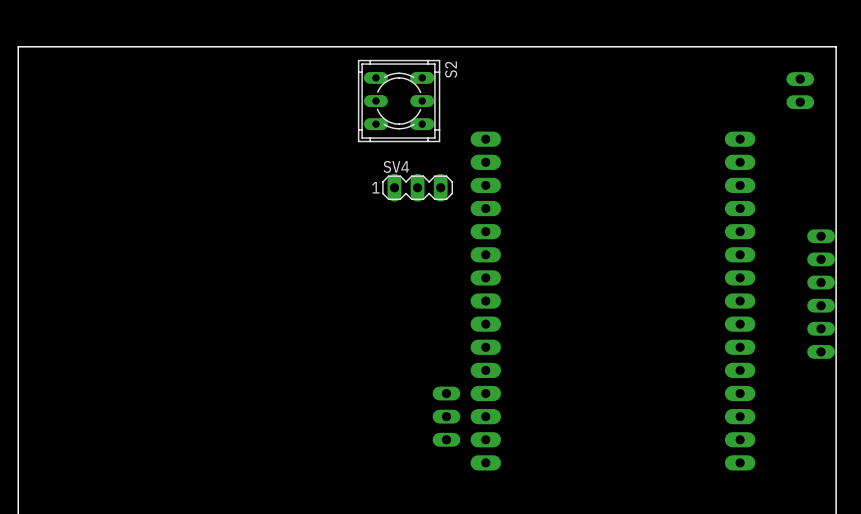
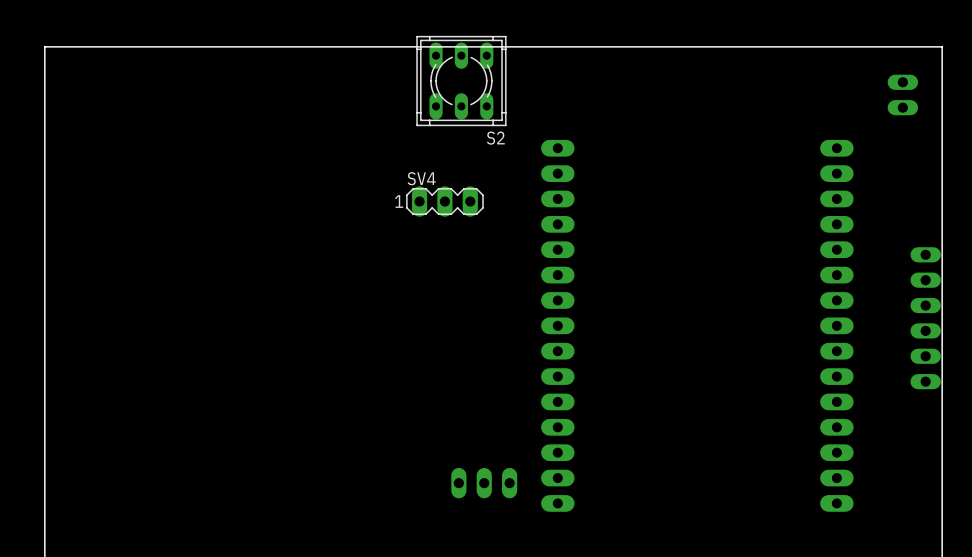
S2 rotation: 0° (399, 101) -> 90° clockwise (461, 81)
SV4 position: (417, 187) -> (444, 201)
part rotation: 0° (446, 416) -> 90° clockwise (484, 483)
part position: (446, 416) -> (484, 483)

